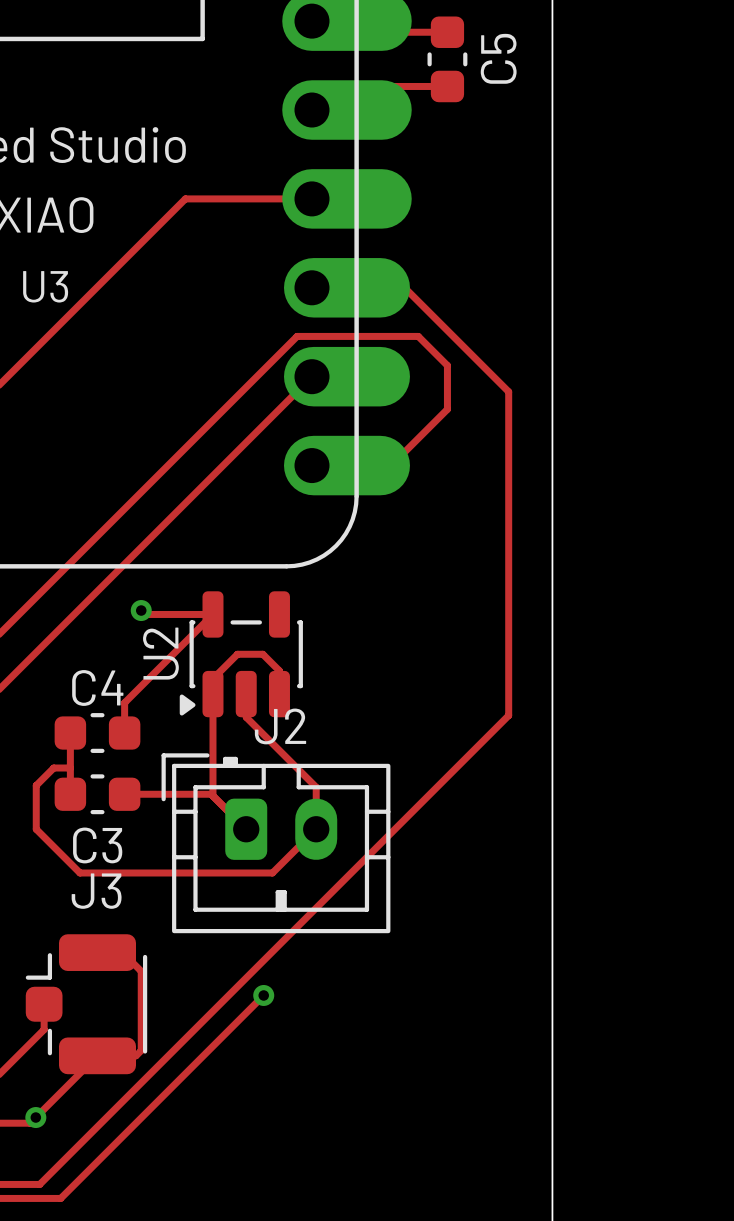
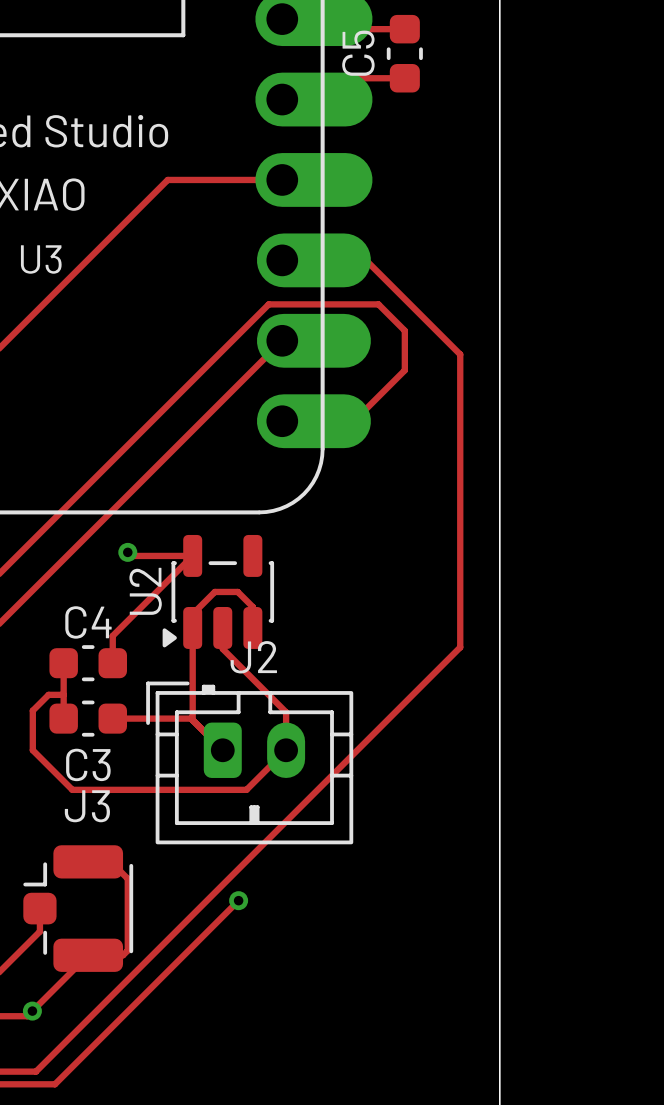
C5 name position: C5 (498, 58) -> C5 (358, 53)

